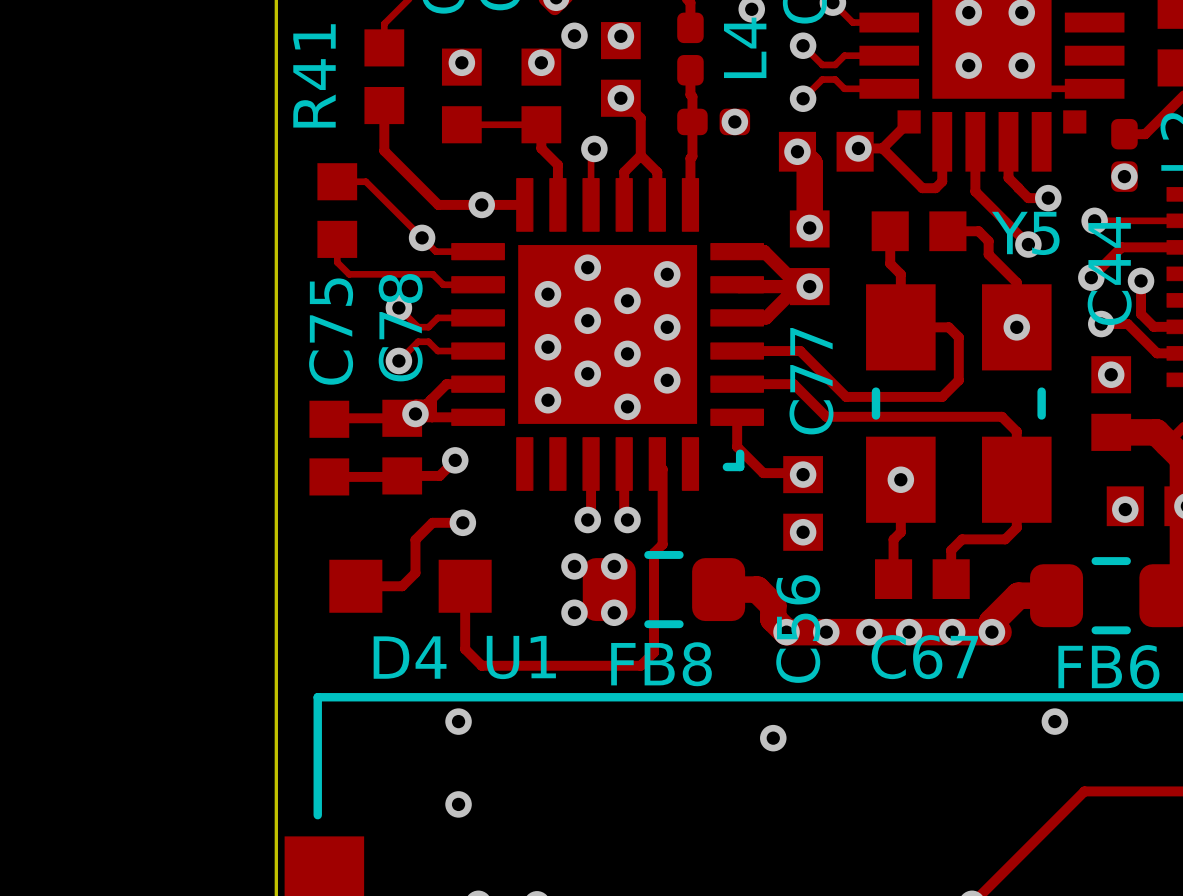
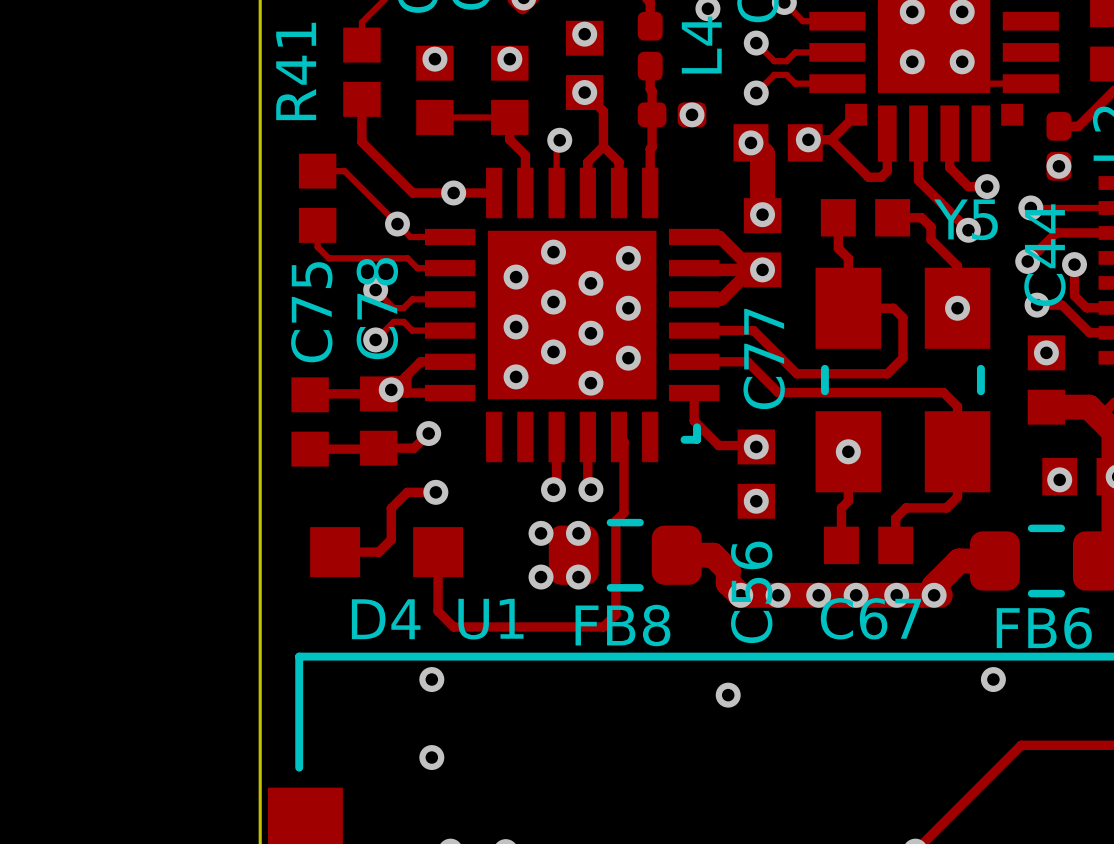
via: (574, 35) -> none

